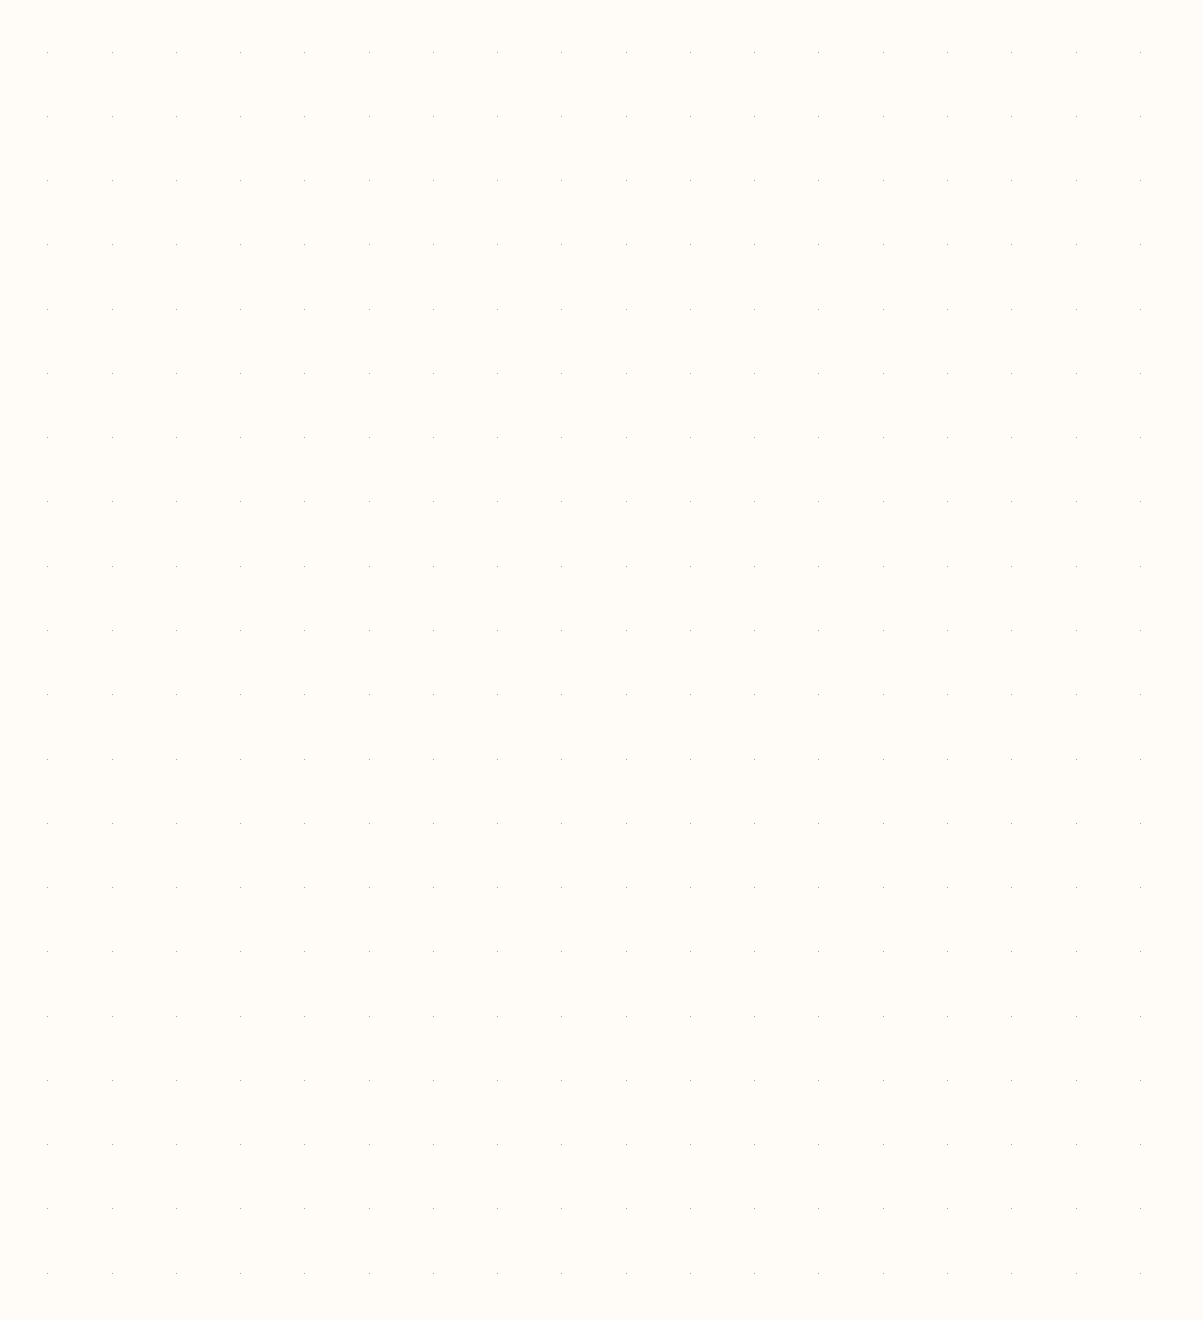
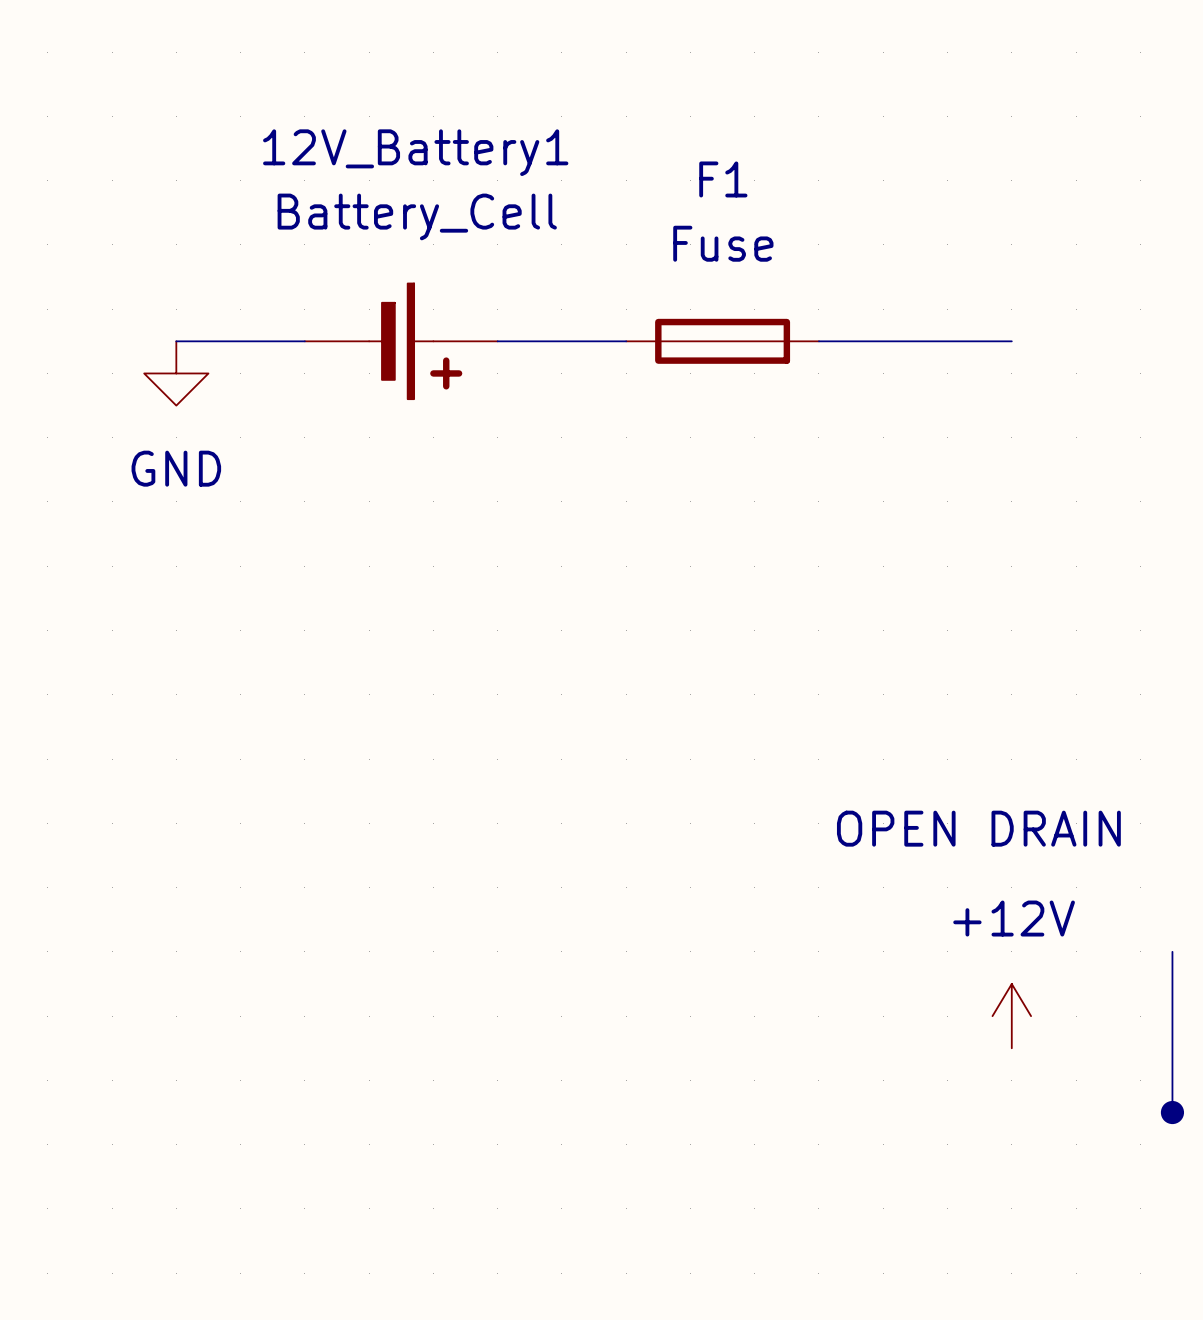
wire: none -> (176, 341) (304, 341)
12V_Battery1: none -> Battery_Cell (401, 341)
wire: none -> (497, 341) (626, 341)
F1: none -> Fuse (722, 341)
wire: none -> (818, 341) (1011, 341)
power symbol: none -> GND (176, 373)
text: none -> OPEN DRAIN (978, 828)
wire: none -> (1172, 951) (1172, 1112)
power symbol: none -> +12V (1011, 1016)
junction: none -> (1172, 1112)

